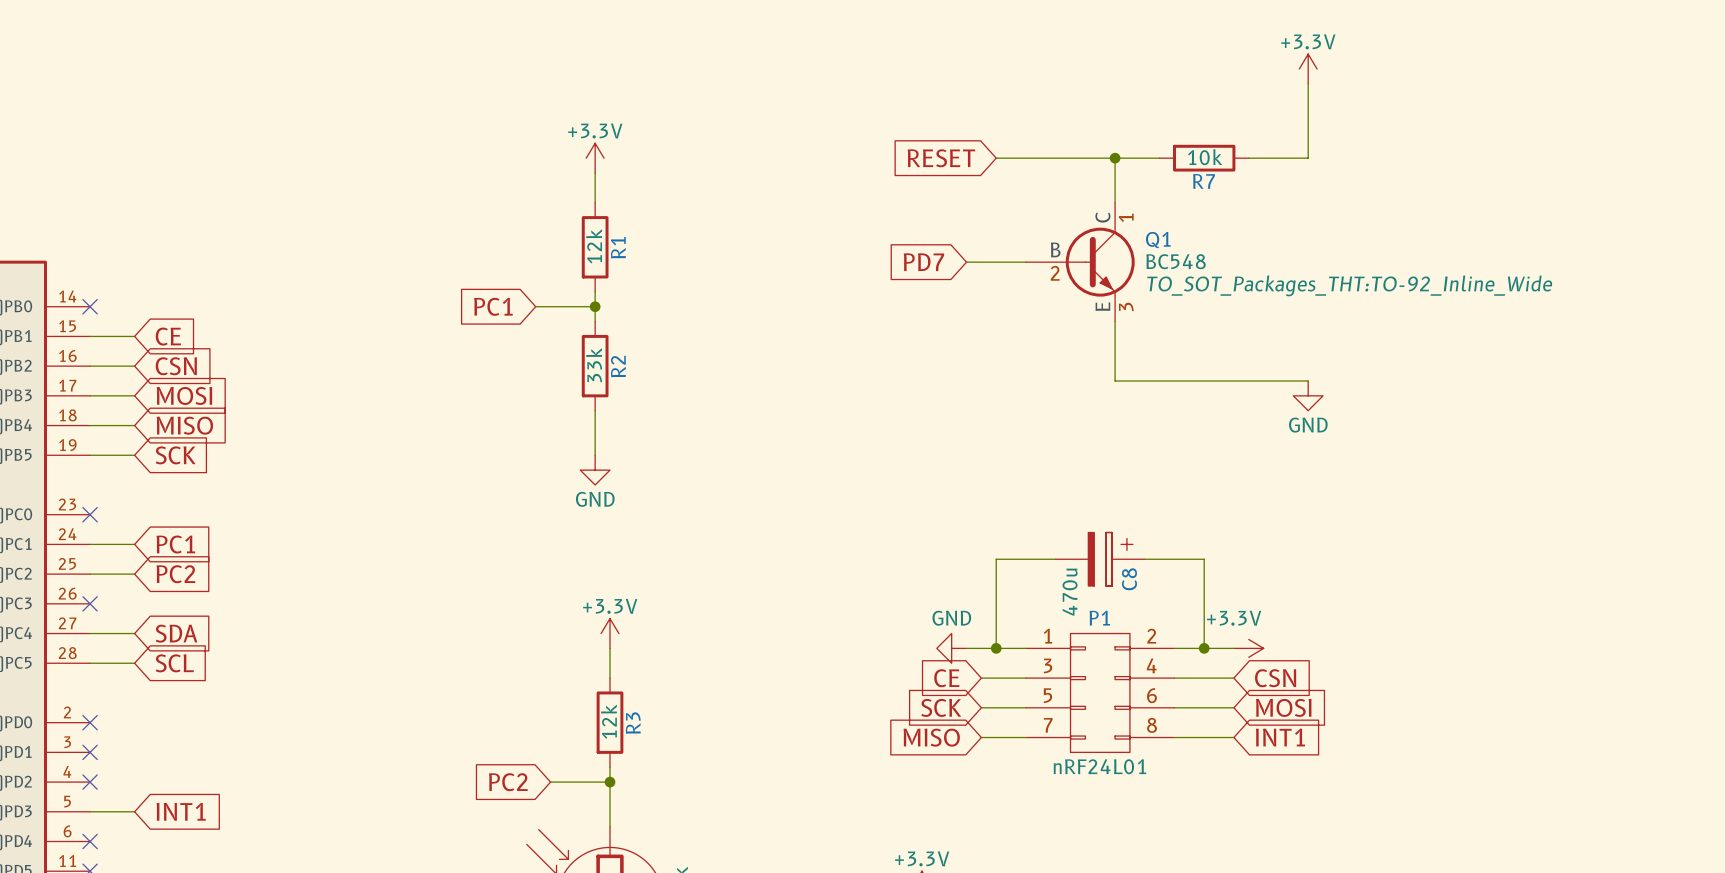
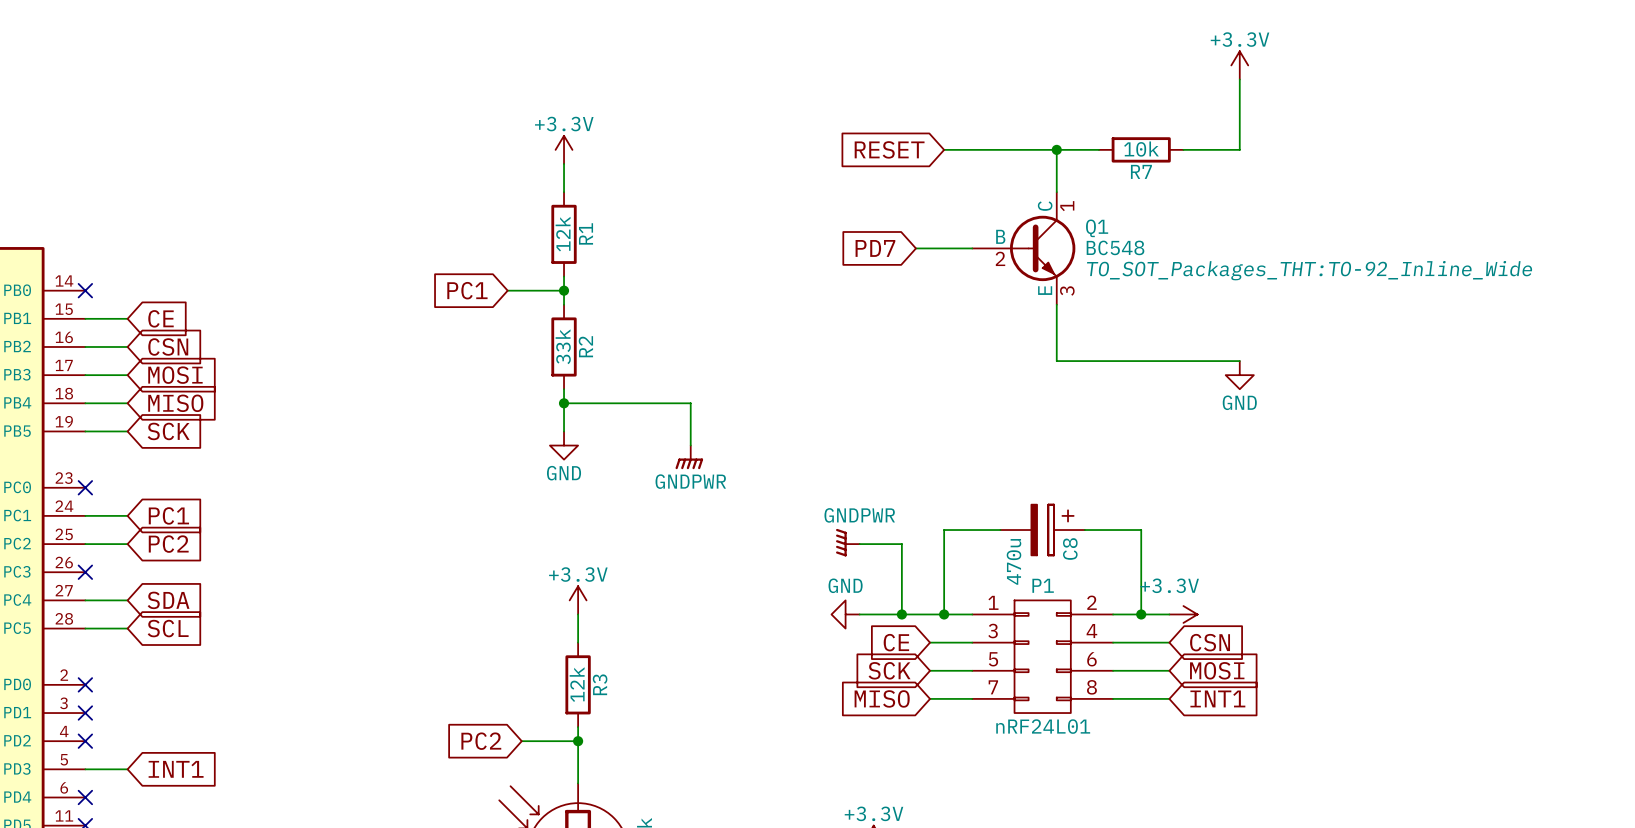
wire: none -> (564, 403) (690, 403) (690, 445)
junction: none -> (564, 403)
power symbol: none -> GNDPWR (689, 457)
power symbol: none -> GNDPWR (847, 542)
wire: none -> (859, 544) (901, 544) (901, 614)
wire: none -> (859, 614) (915, 614)
power symbol position: GND (951, 648) -> GND (845, 614)
junction: none -> (901, 614)

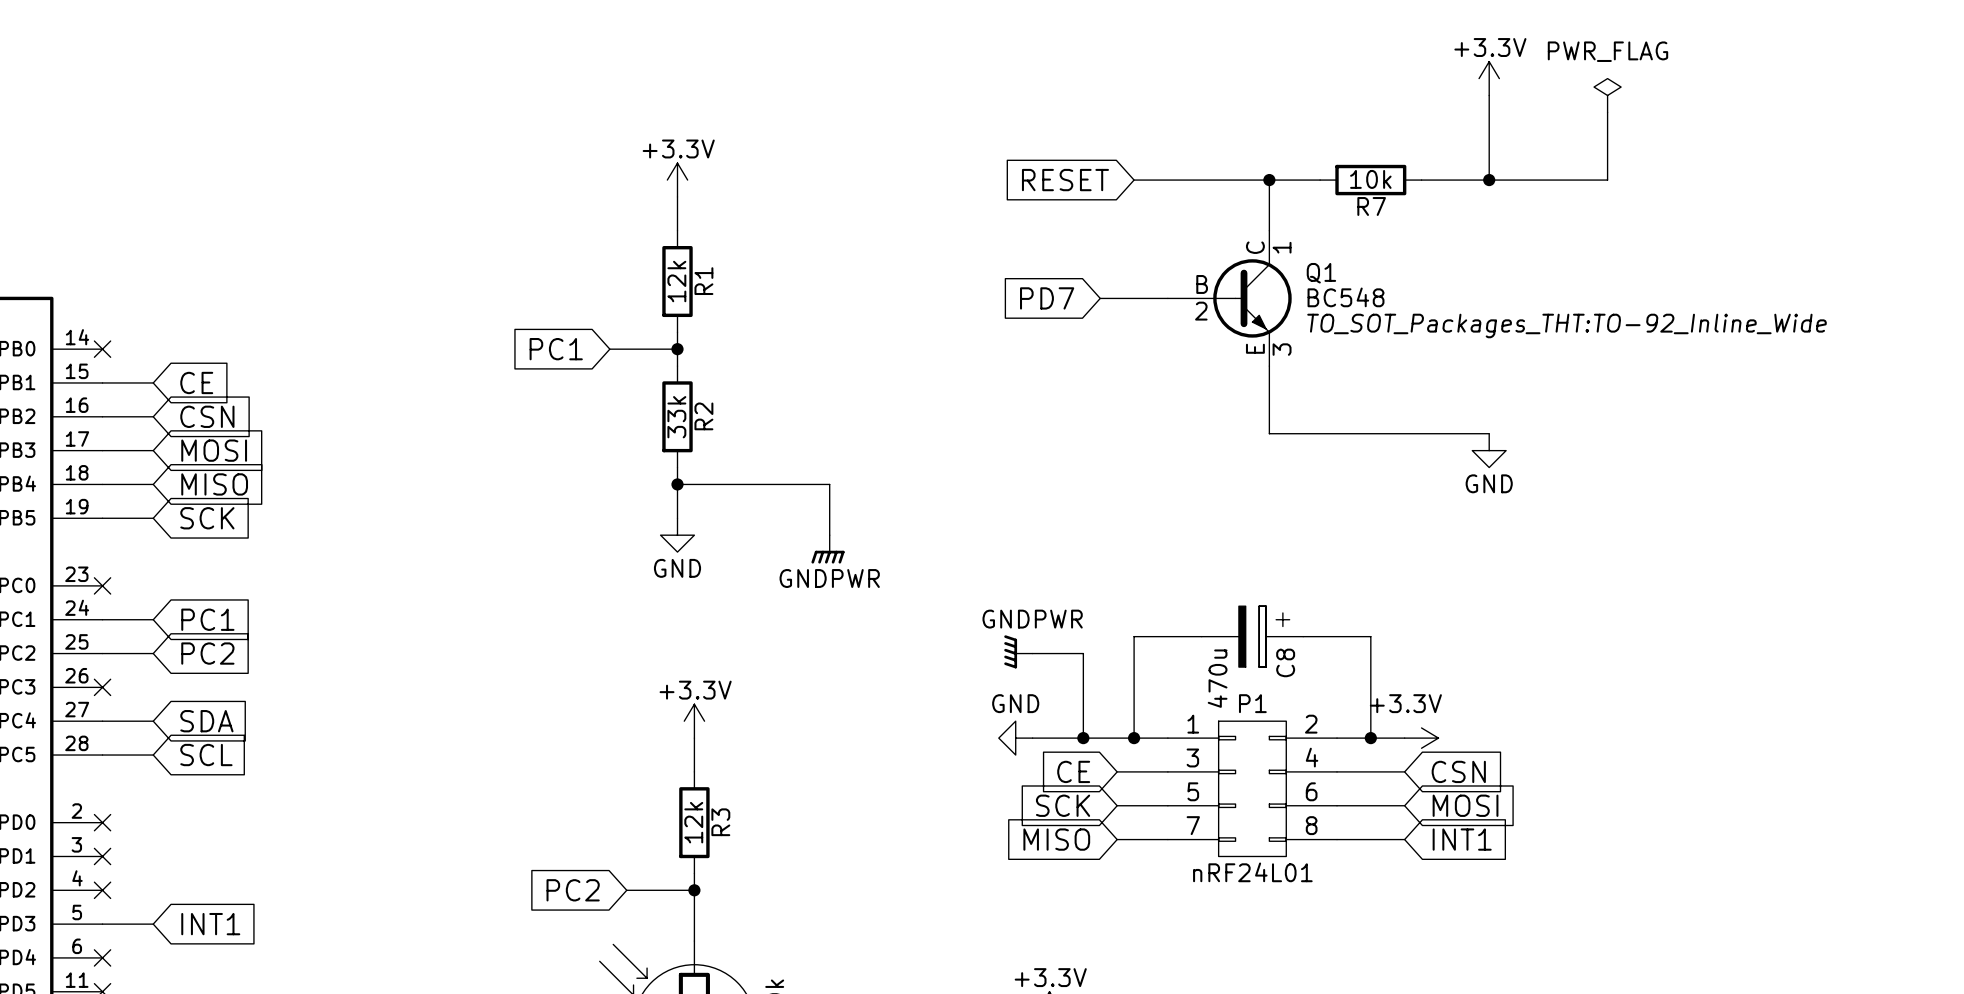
power symbol: none -> PWR_FLAG (1607, 95)
wire: none -> (1607, 112) (1607, 180) (1489, 180)
junction: none -> (1489, 180)

